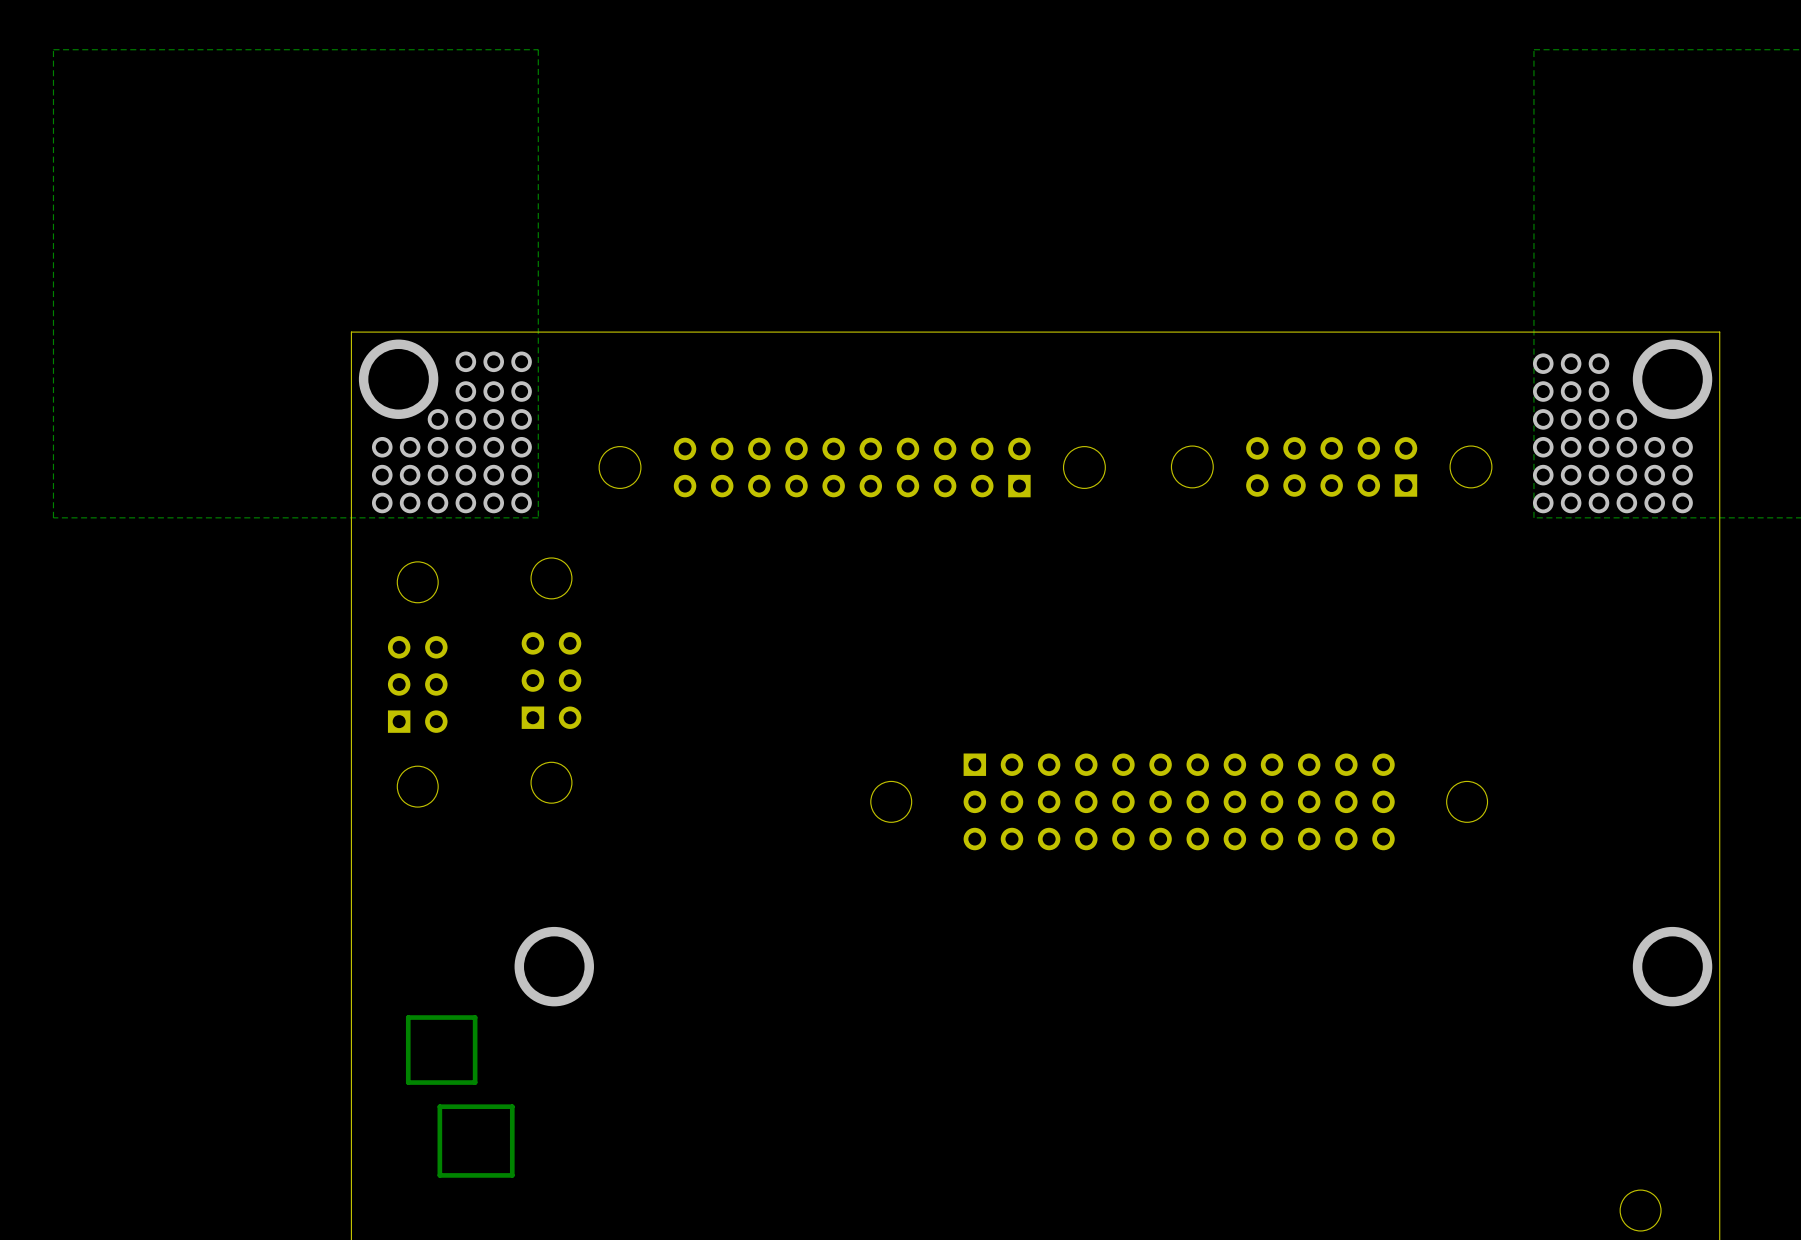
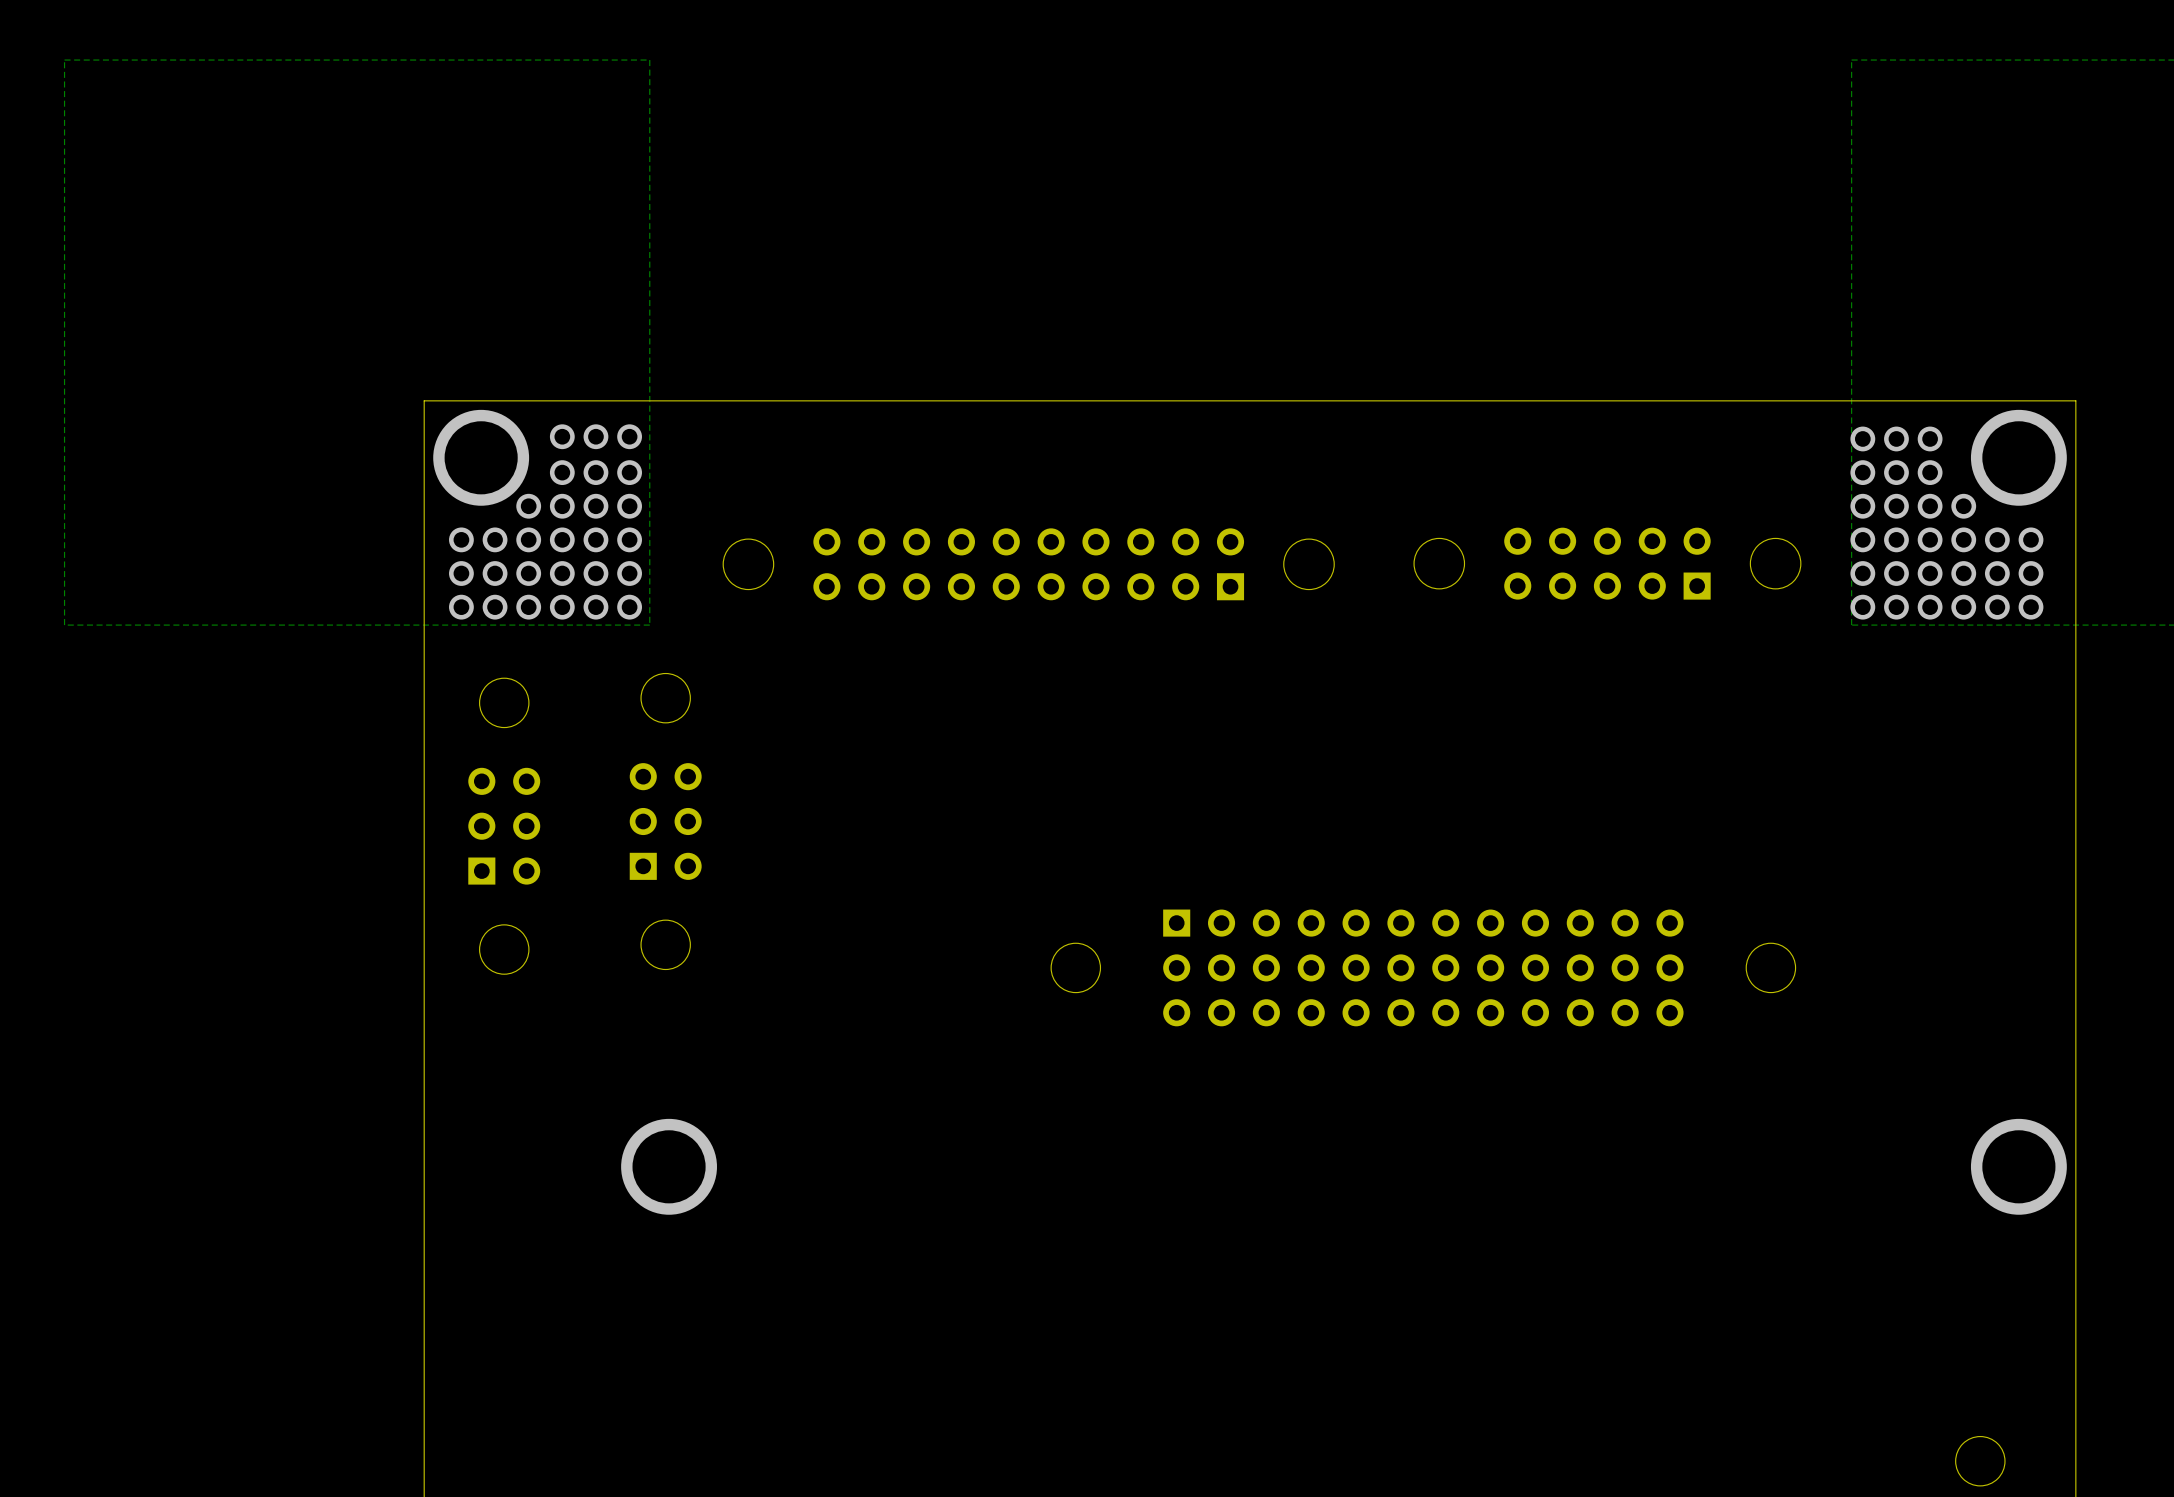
track: (475, 1017) (408, 1017) (408, 1082) (475, 1082) (475, 1017) -> none
track: (512, 1106) (439, 1106) (439, 1175) (512, 1175) (512, 1106) -> none

